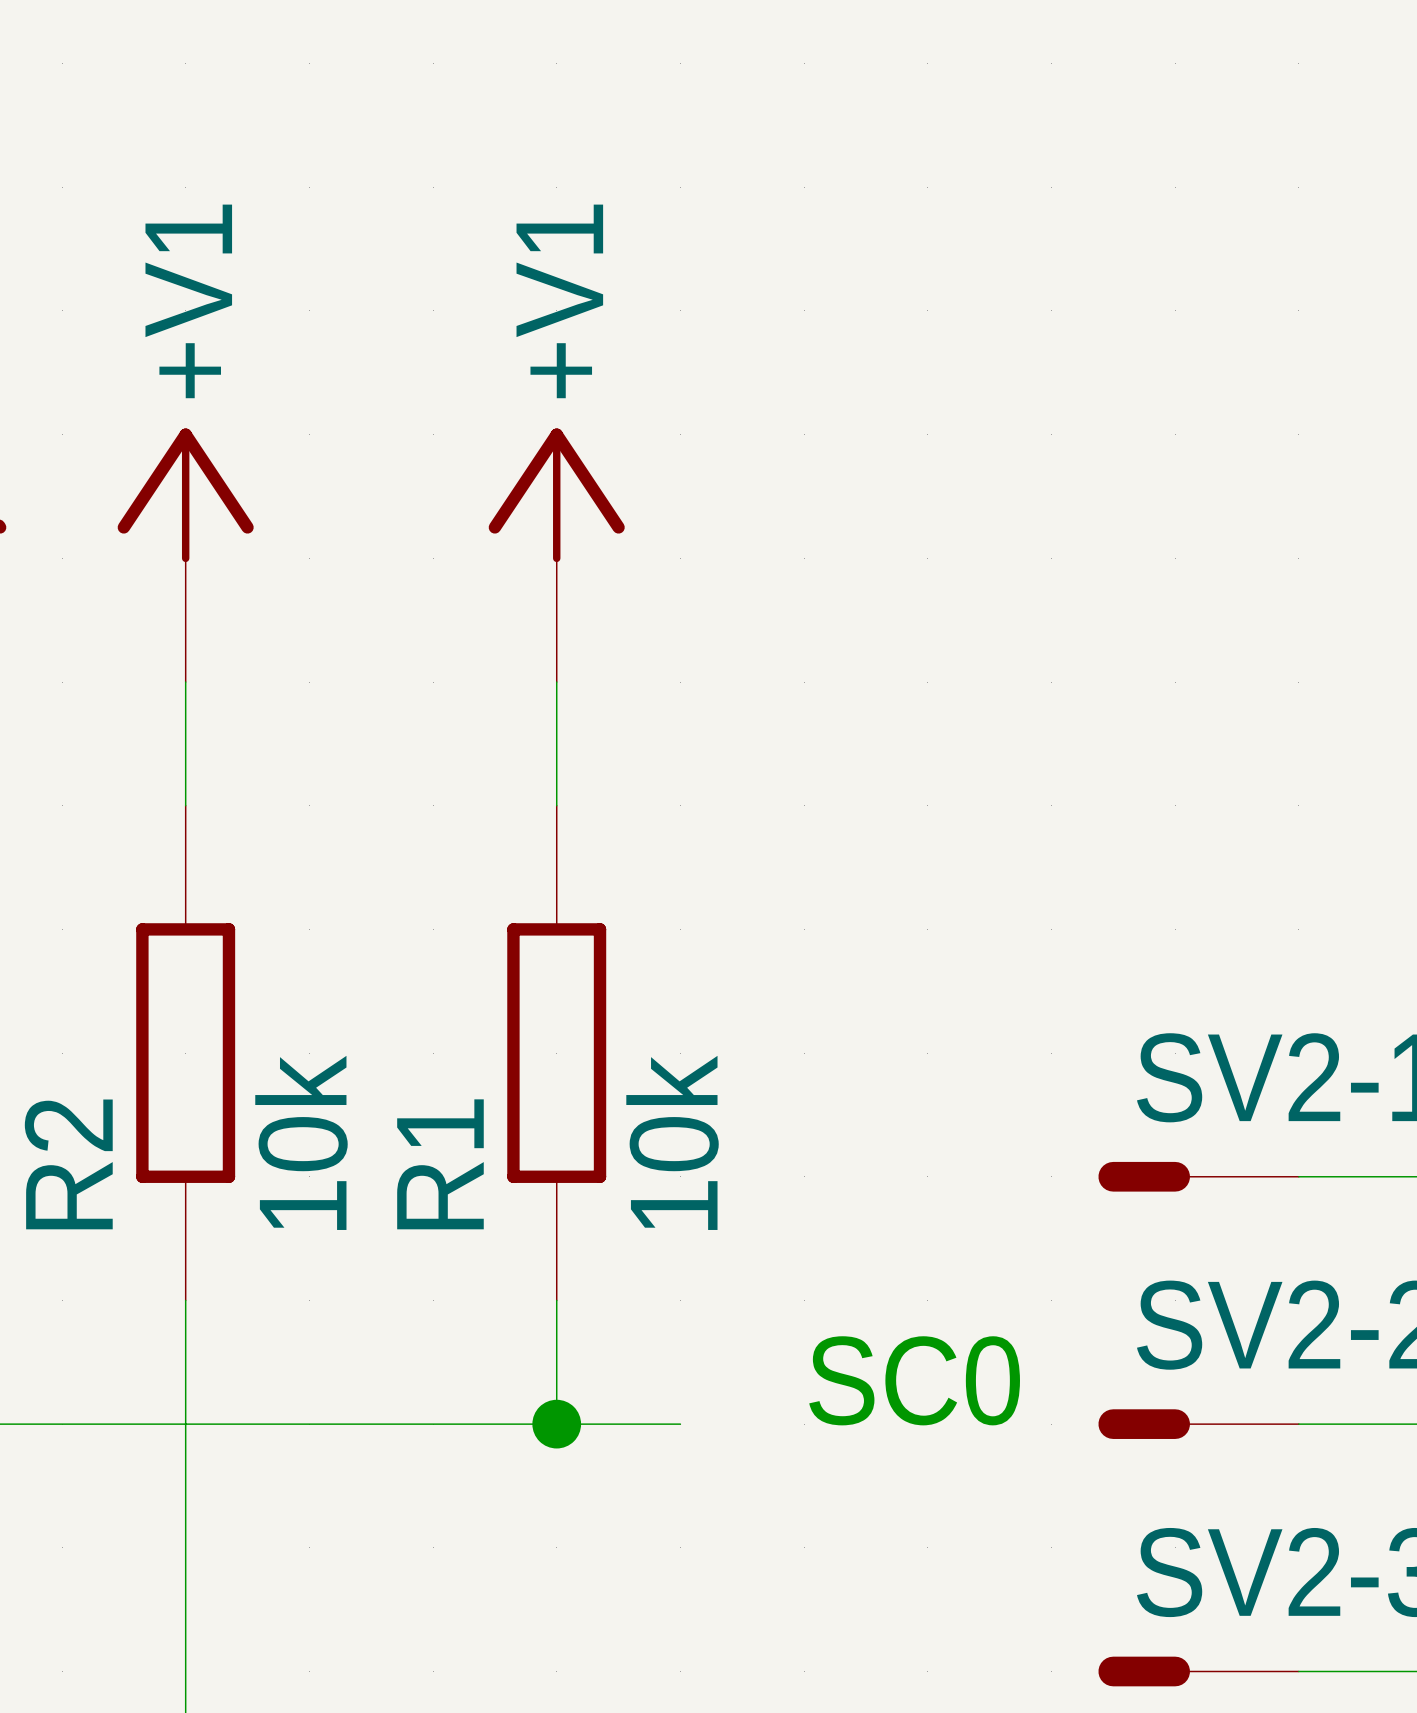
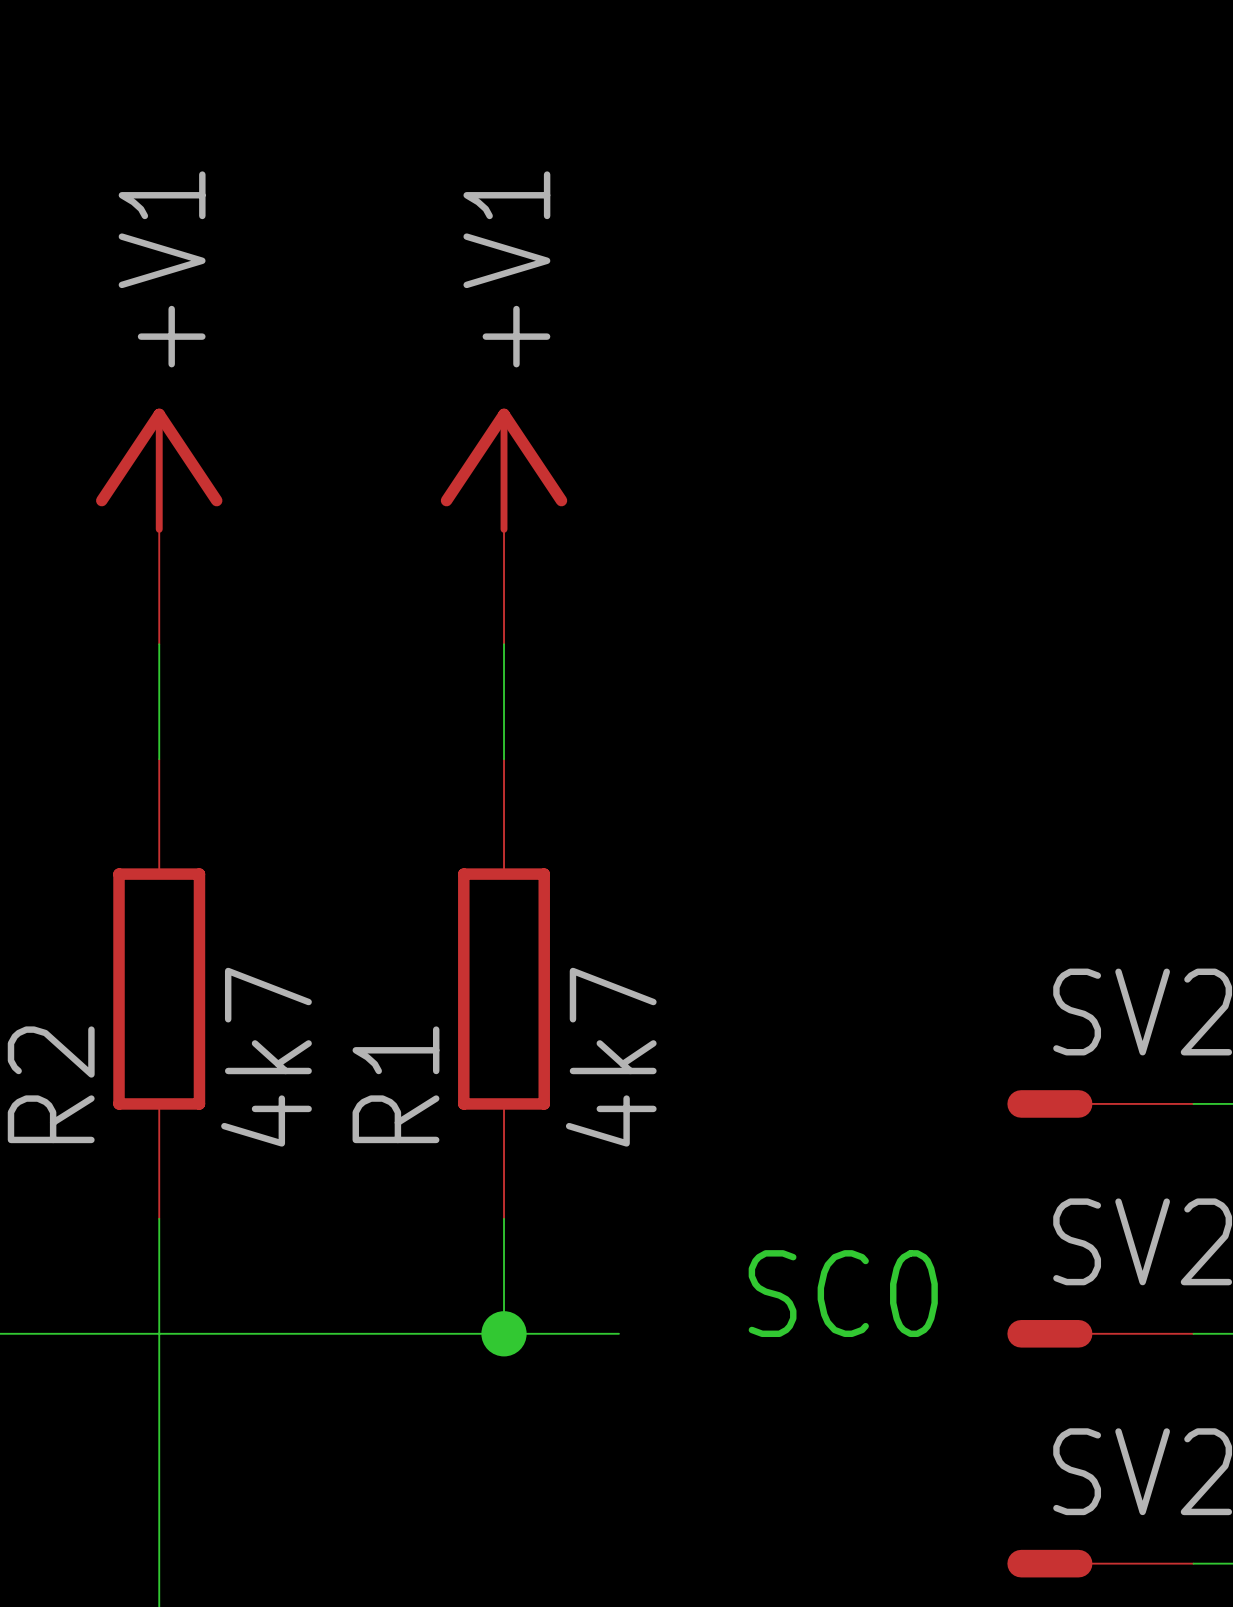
R2 value: 10k (301, 1142) -> 4k7 (266, 1057)
R1 value: 10k (672, 1142) -> 4k7 (611, 1057)

